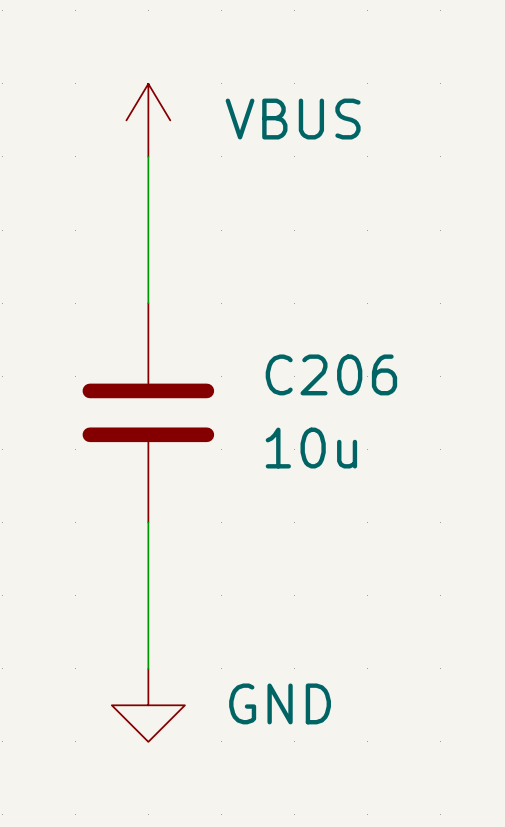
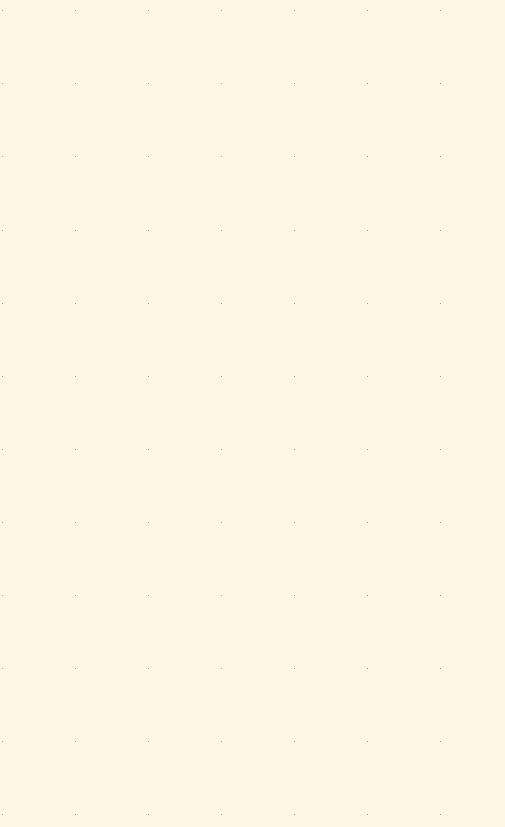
power symbol: VBUS (148, 120) -> none
wire: (148, 156) (148, 303) -> none
C206: 10u (148, 412) -> none
wire: (148, 522) (148, 668) -> none
power symbol: GND (148, 705) -> none

